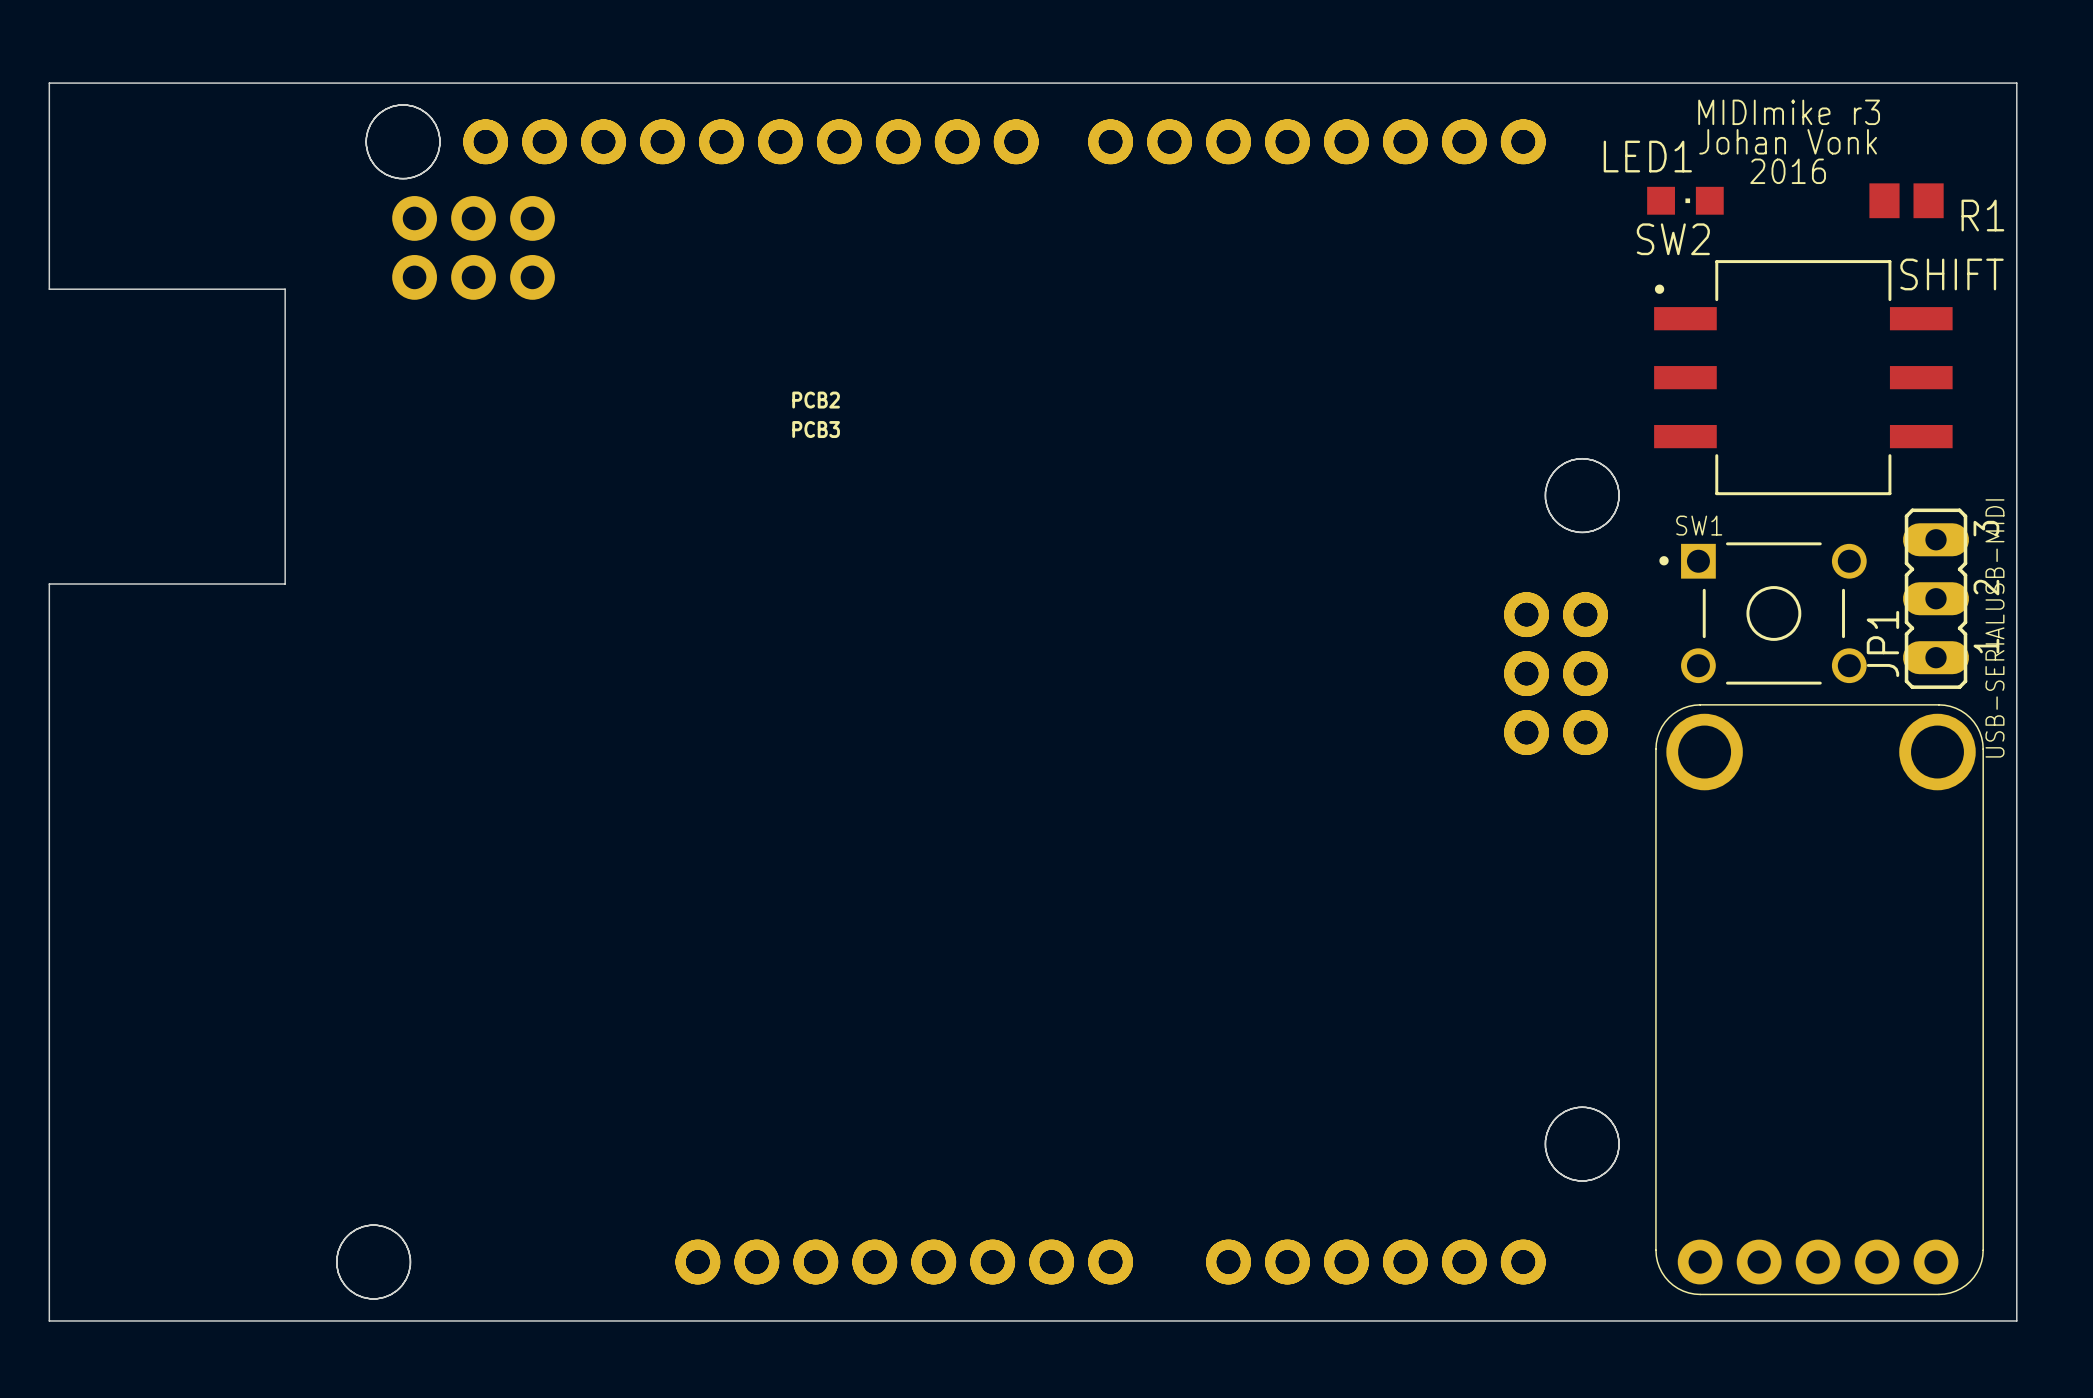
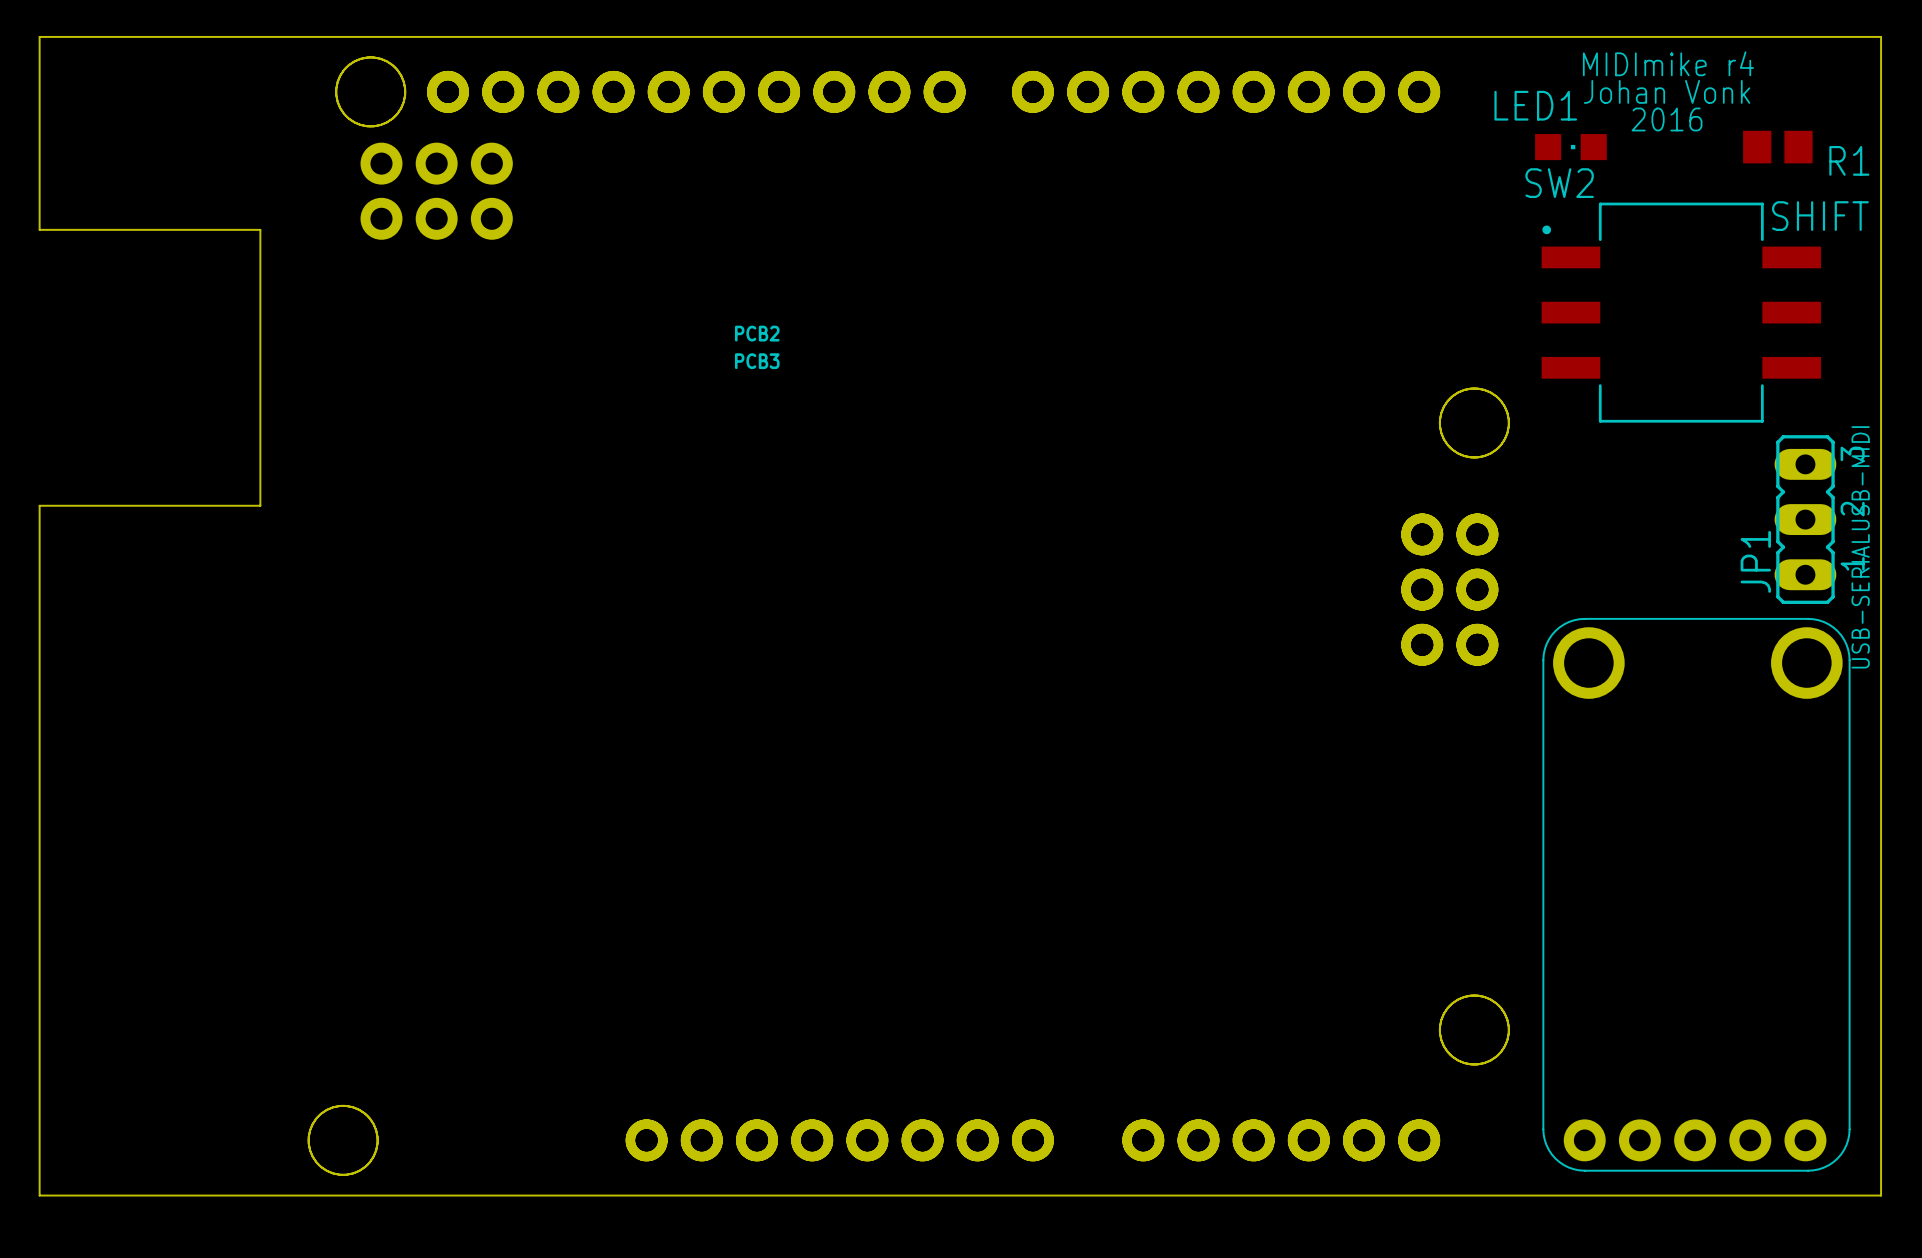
text: MIDImike r3 (1789, 112) -> MIDImike r4 (1668, 63)
SW1: (1763, 613) -> none

